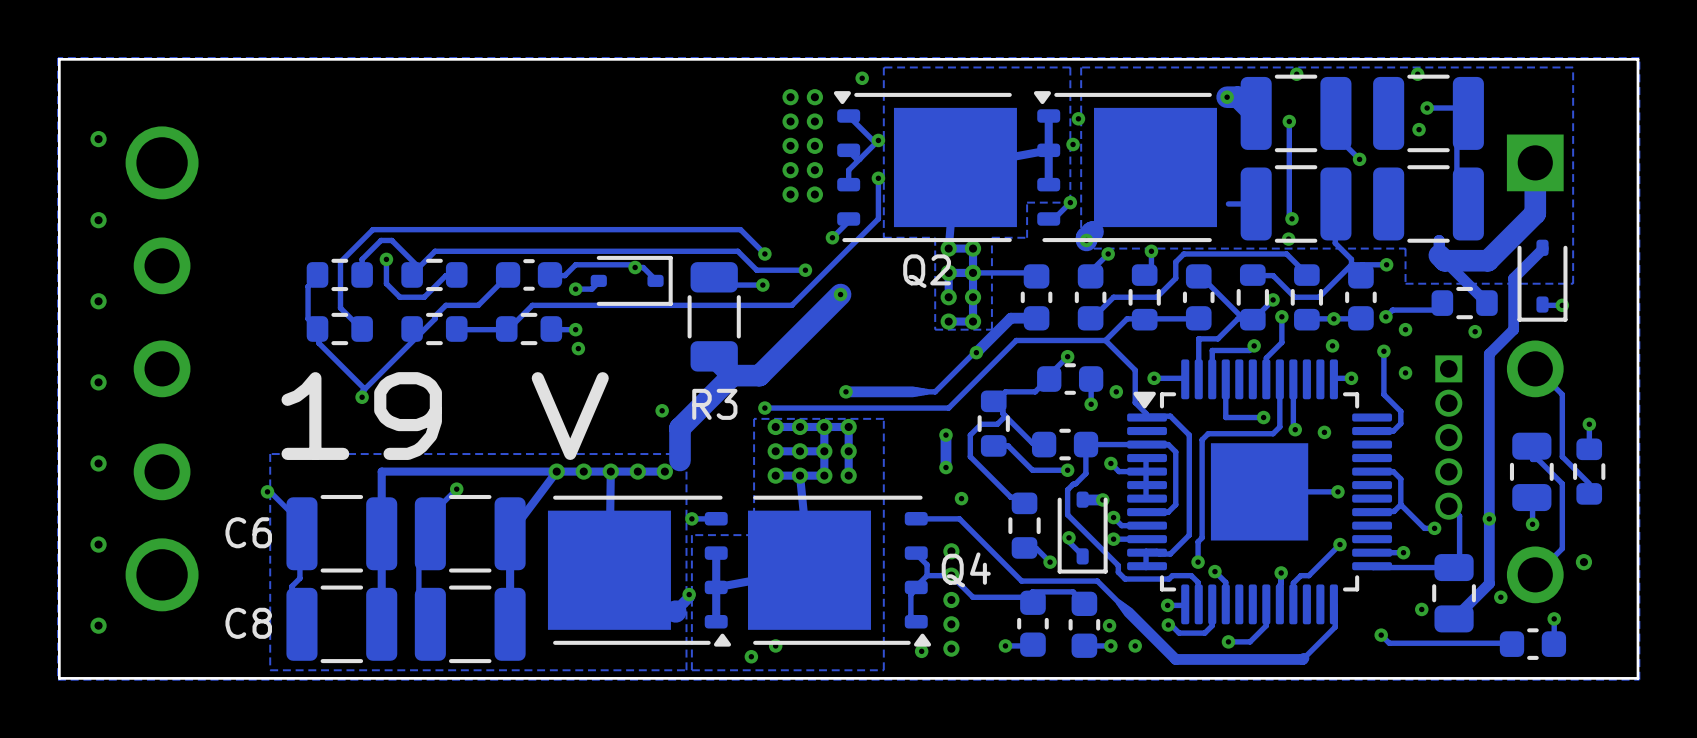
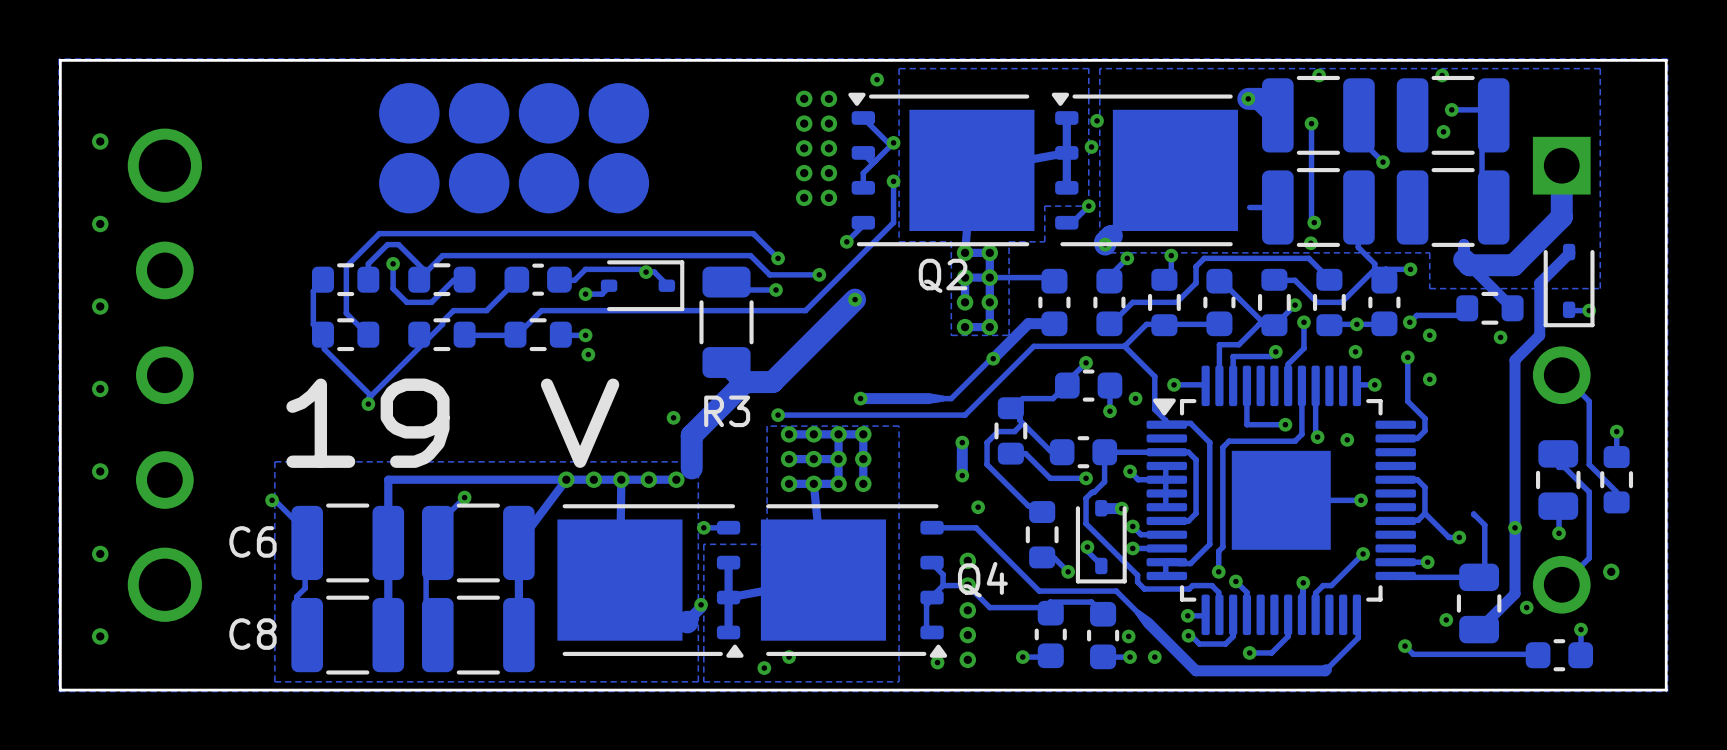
part: none -> (514, 148)
part: (1448, 437) -> none

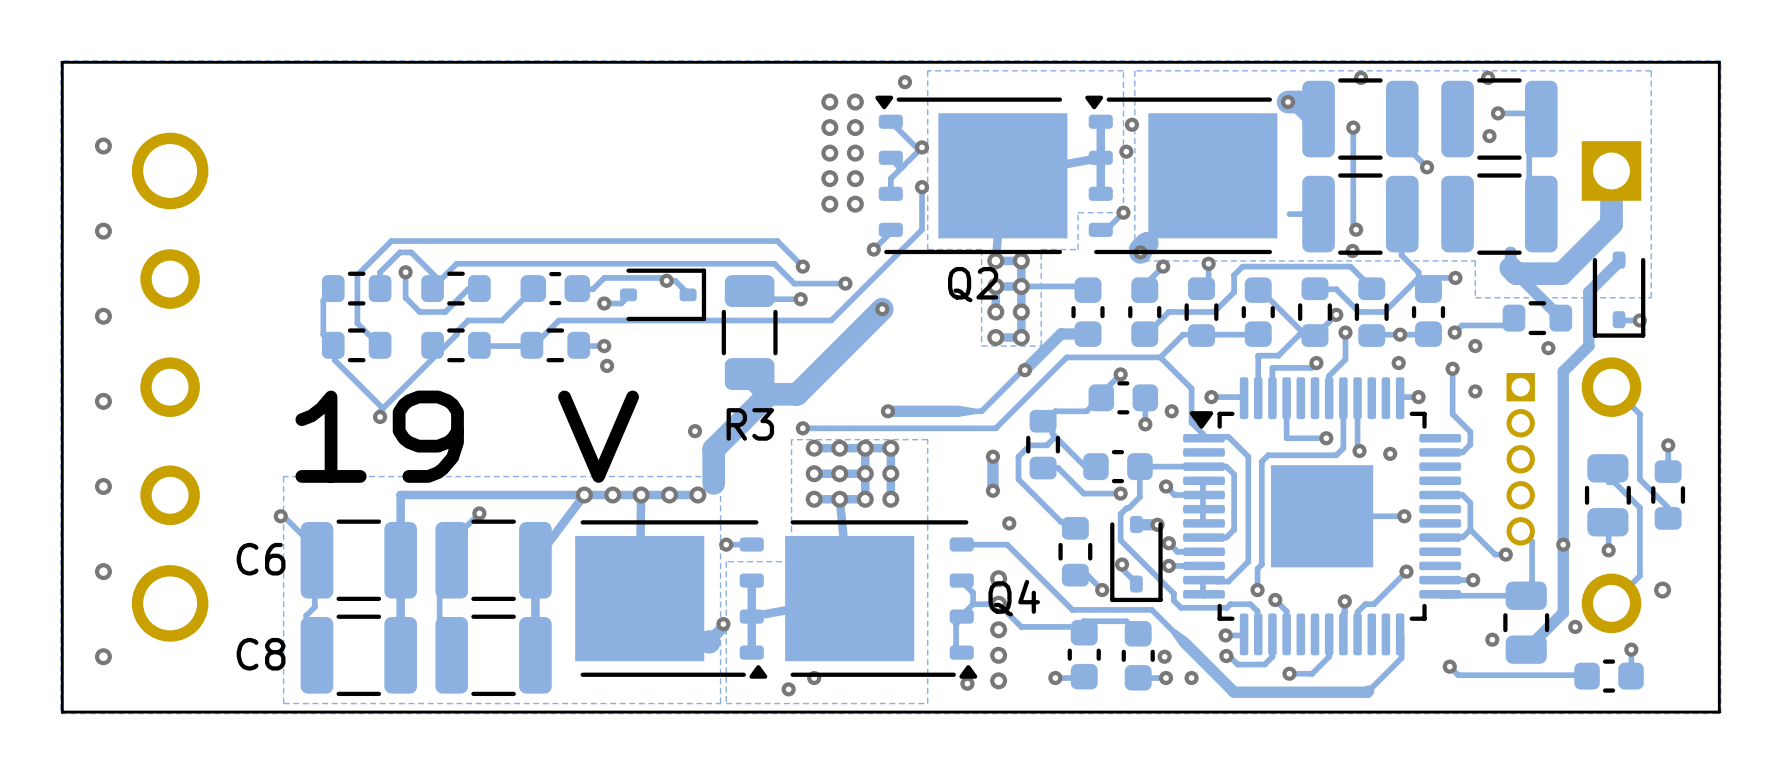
part: (514, 148) -> none
part: none -> (1520, 459)

